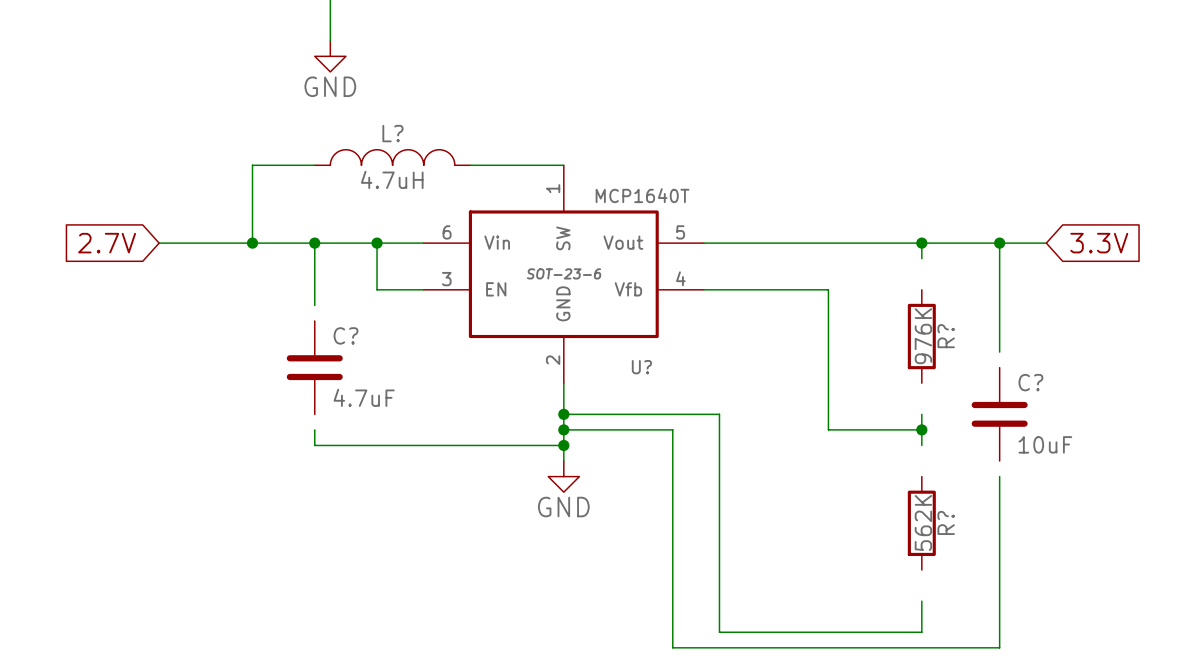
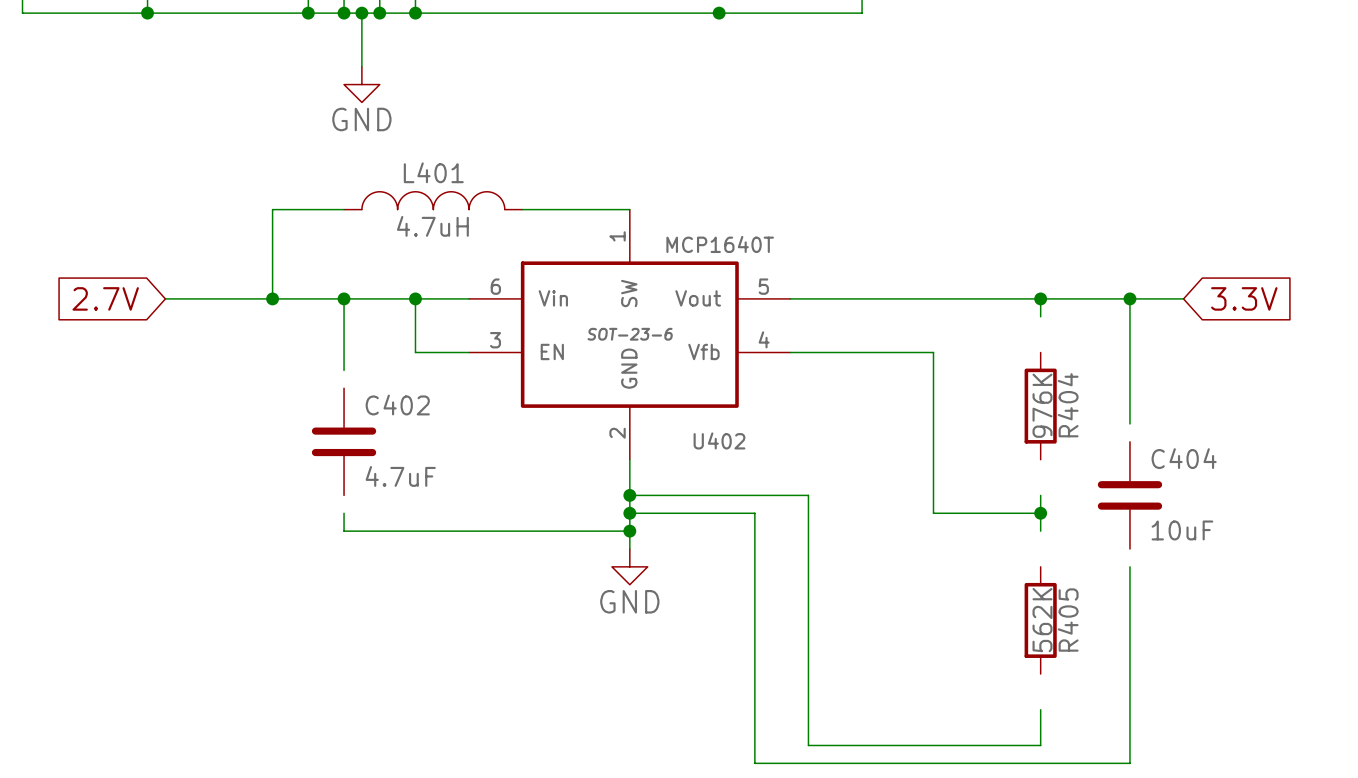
L? name: L? (392, 133) -> L401 (433, 172)
C? name: C? (346, 335) -> C402 (397, 405)
R? name: R? (946, 336) -> R404 (1068, 405)
U? name: U? (641, 367) -> U402 (719, 440)
C? name: C? (1030, 382) -> C404 (1184, 458)
R? name: R? (946, 522) -> R405 (1068, 620)

